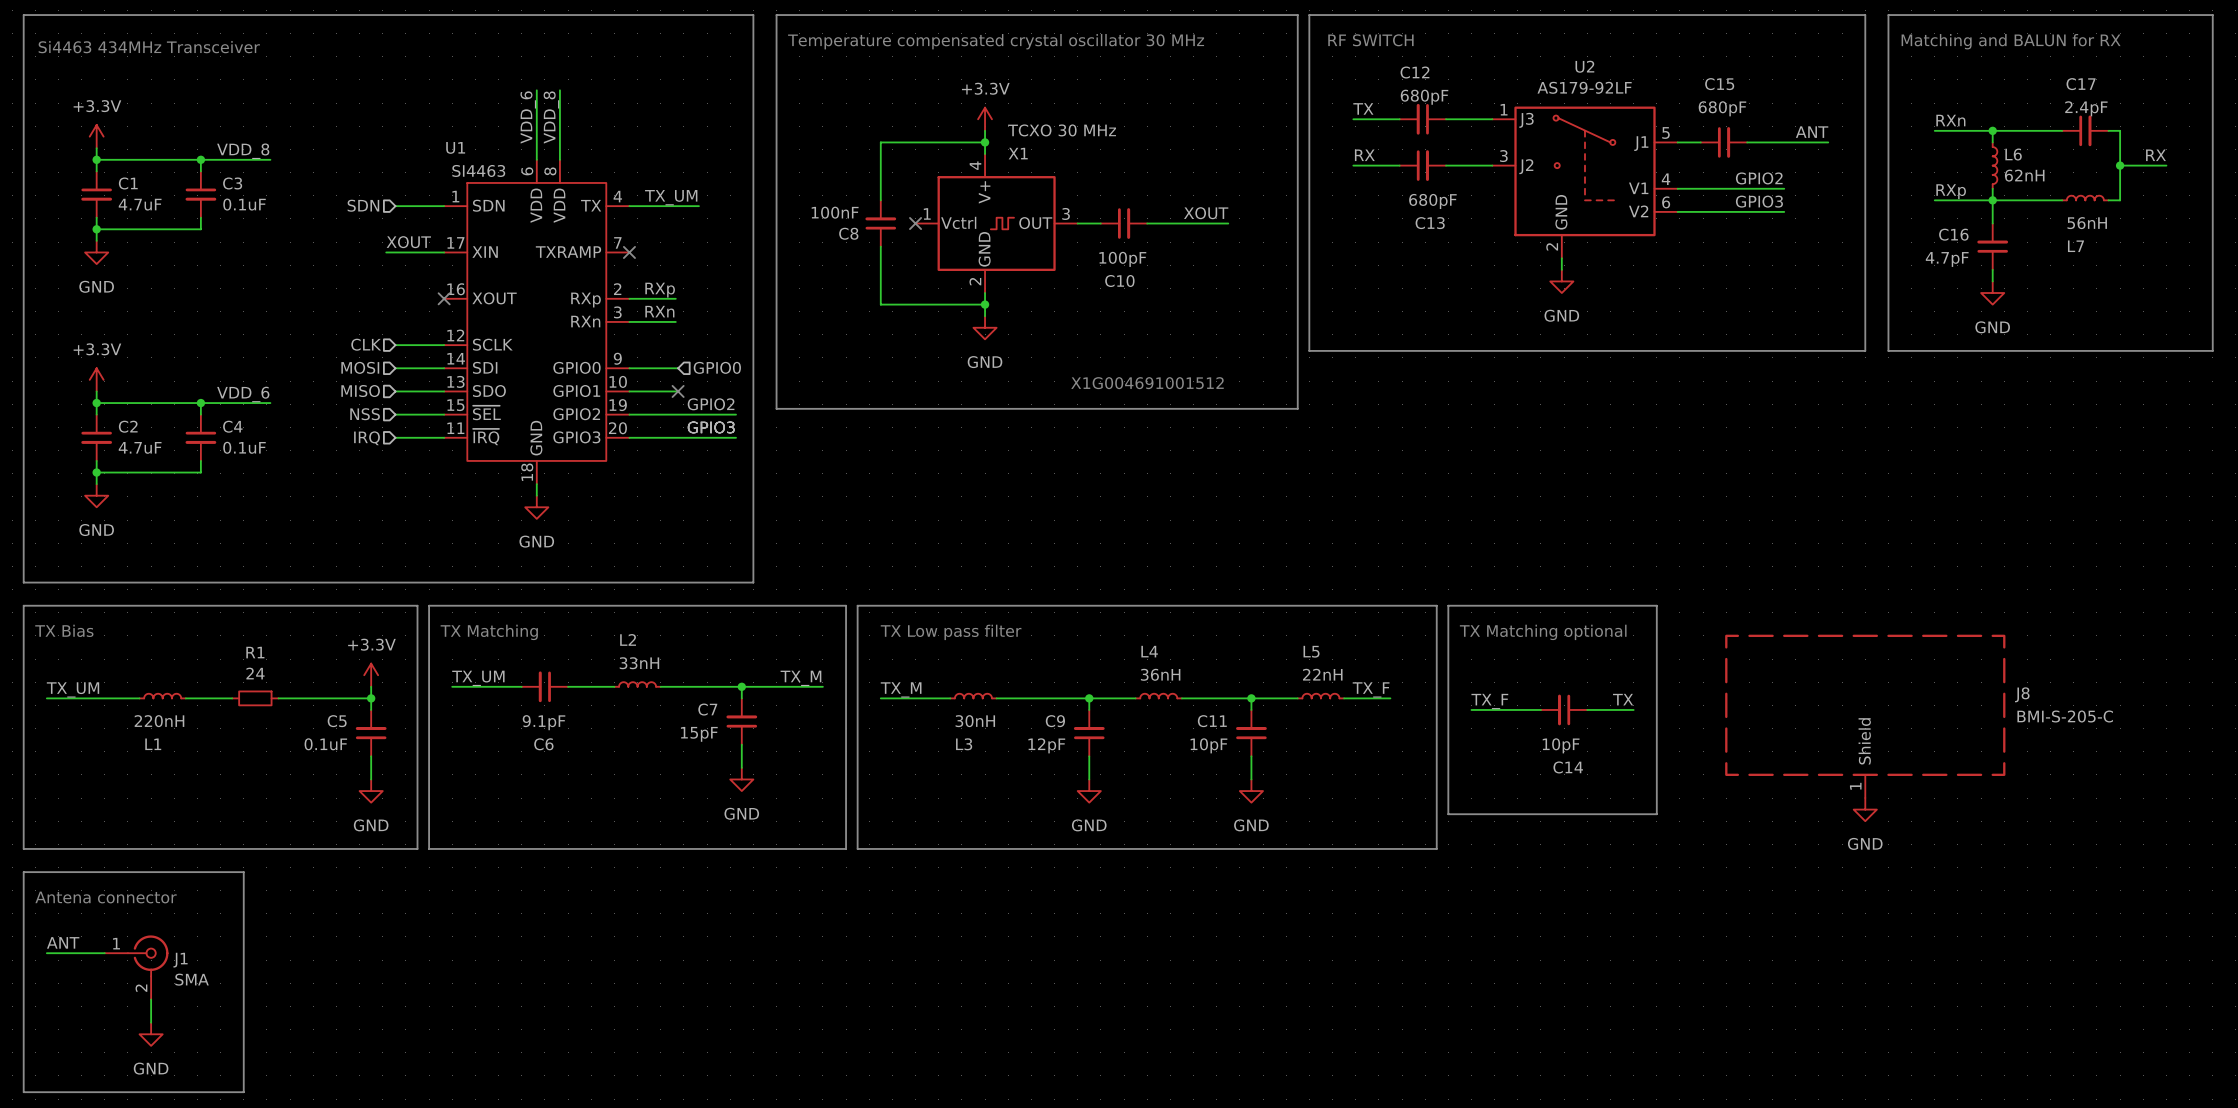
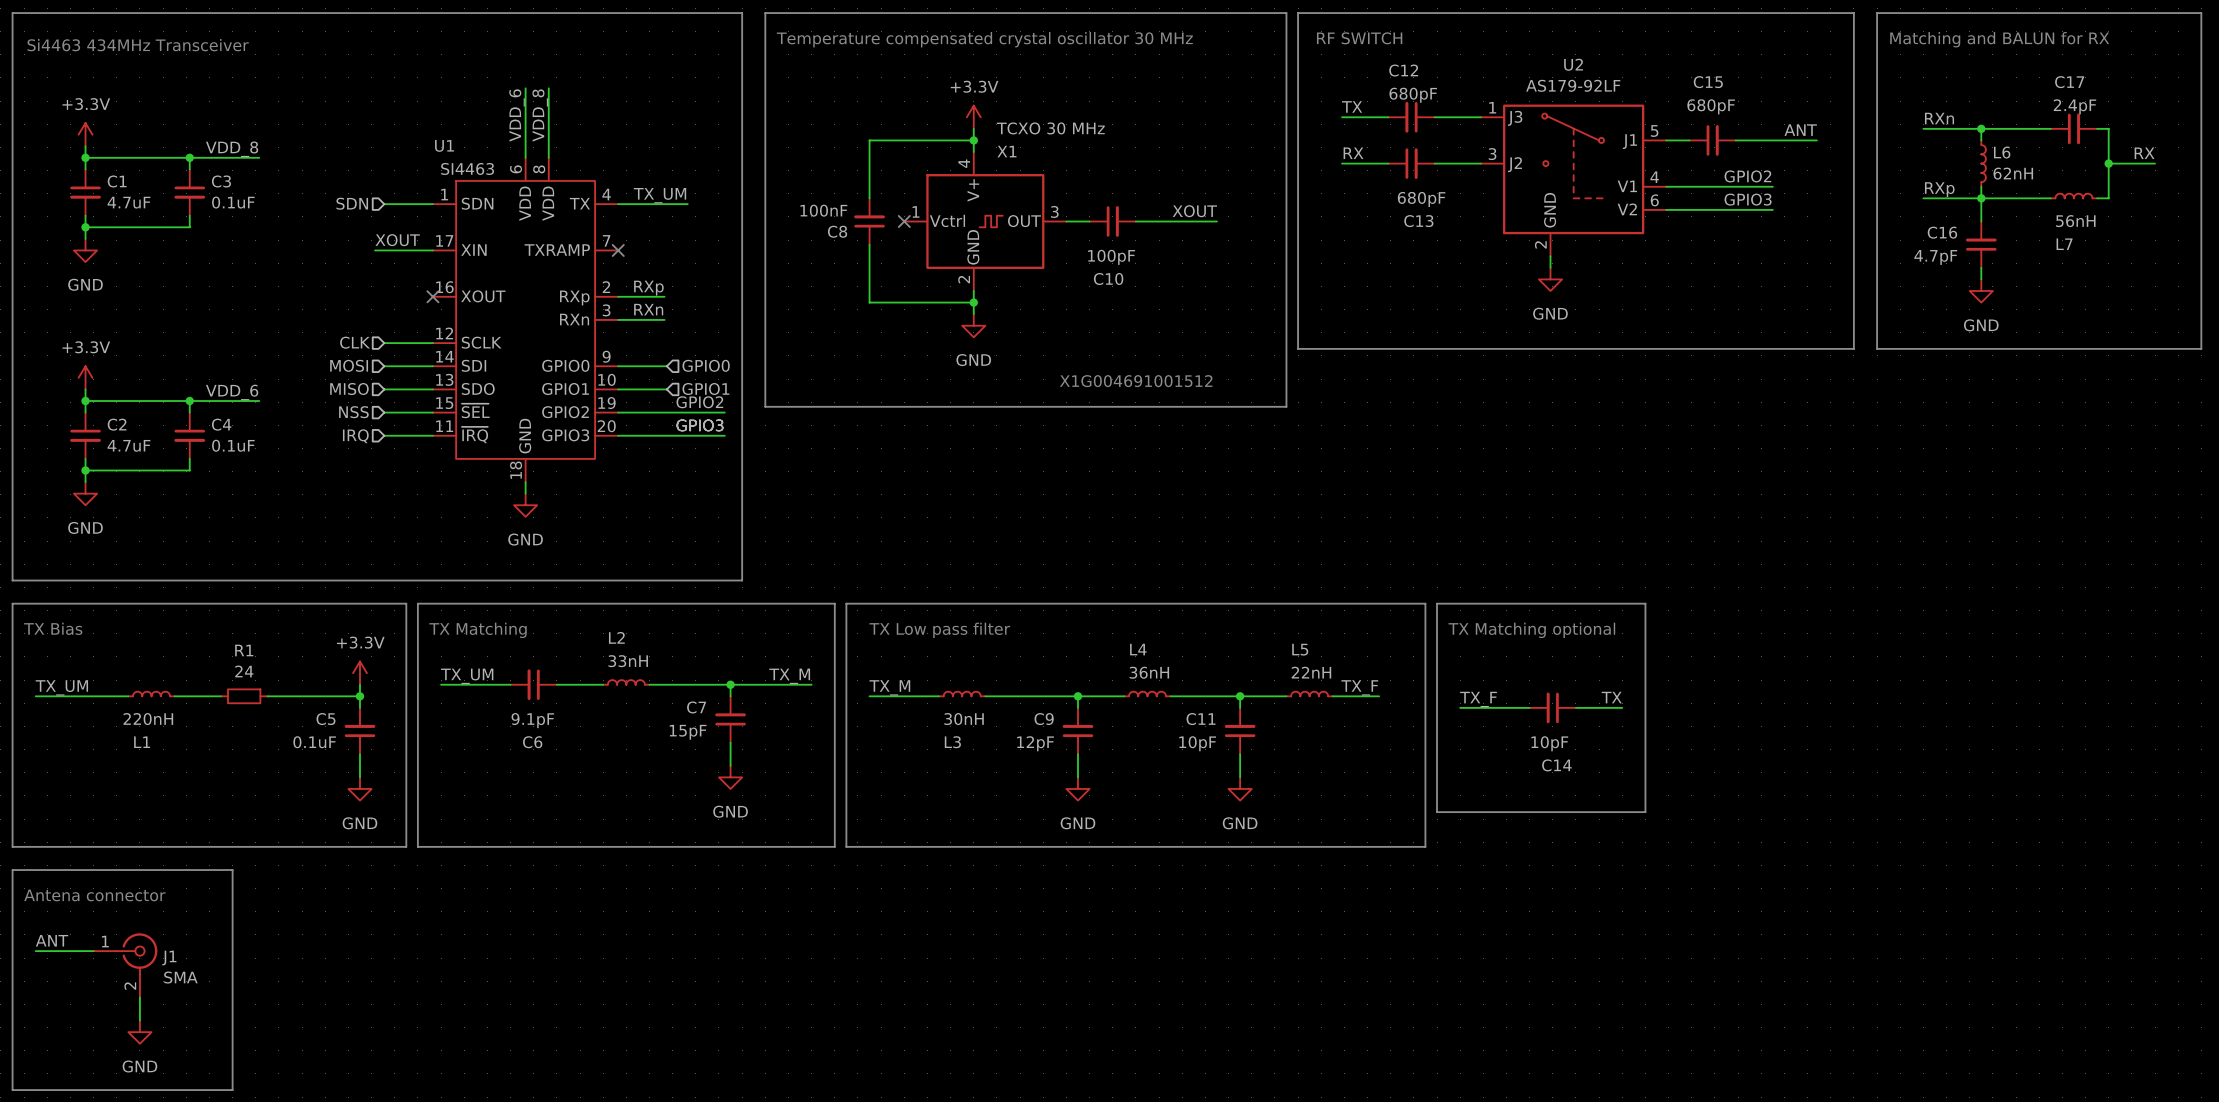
no-connect mark: (678, 391) -> none
hierarchical label: none -> GPIO1 (705, 389)
J8: BMI-S-205-C (1865, 716) -> none
power symbol: GND (1865, 809) -> none

